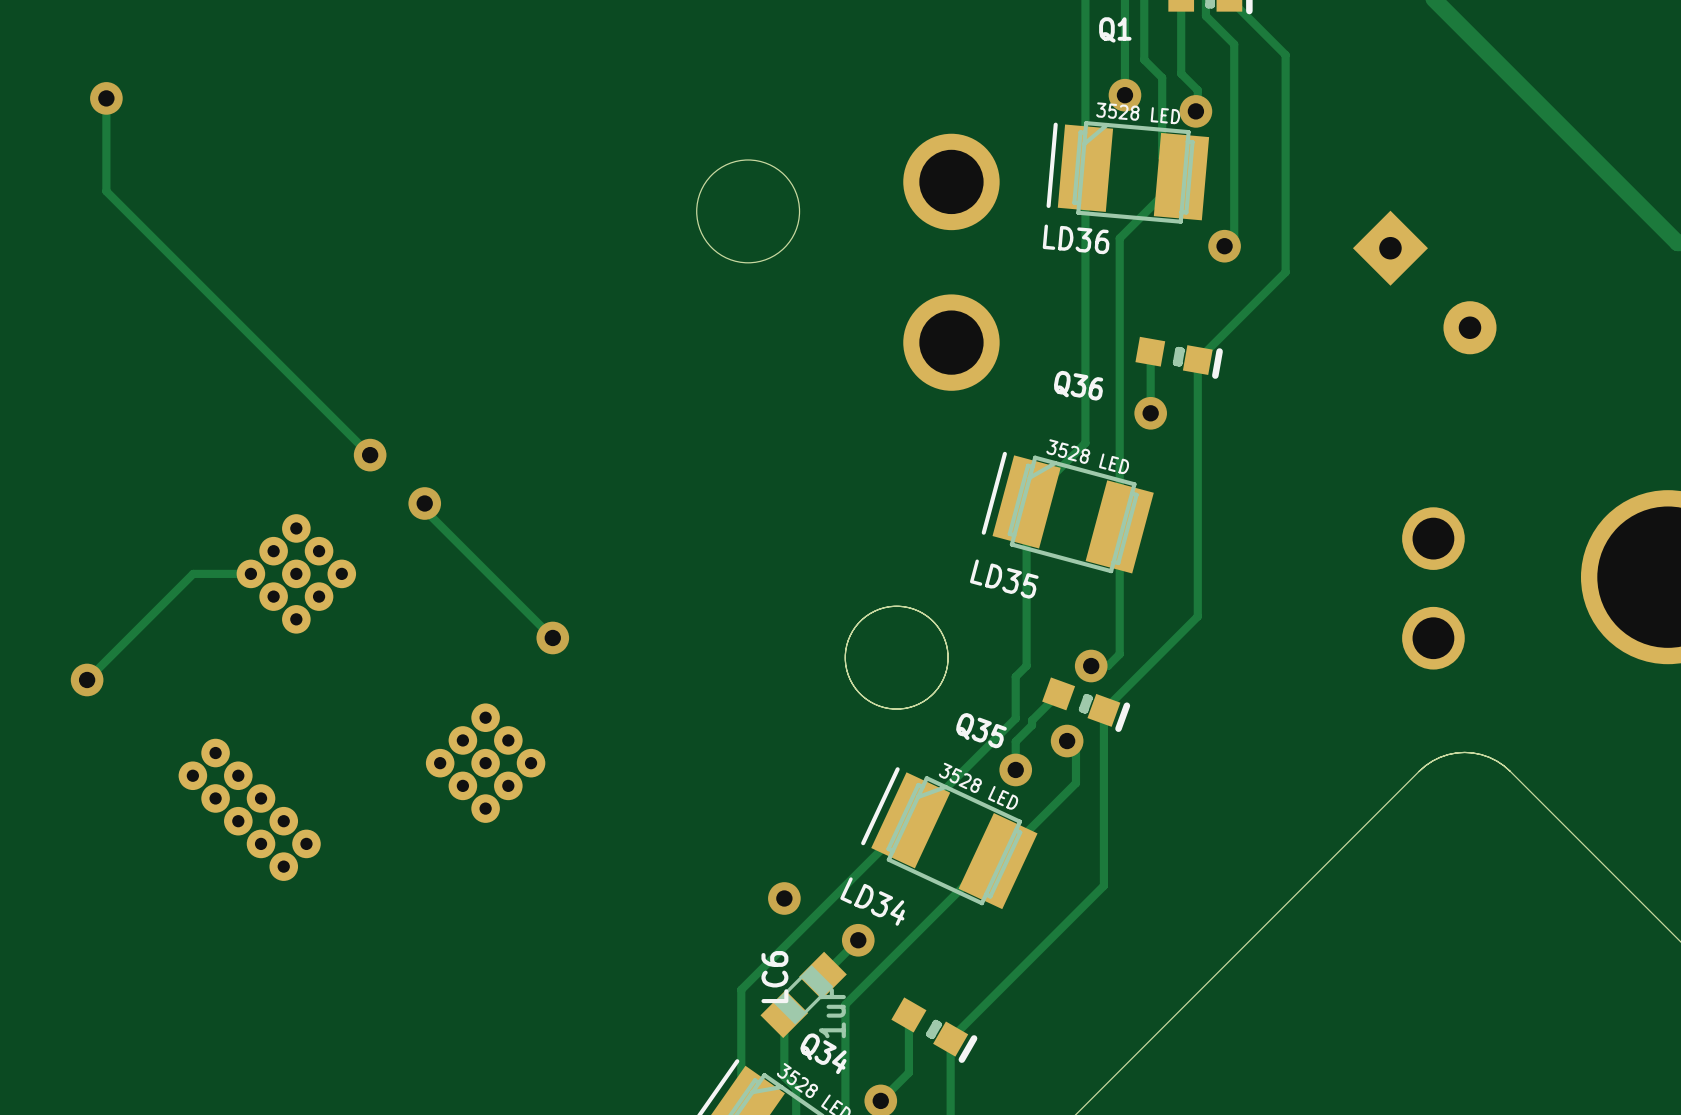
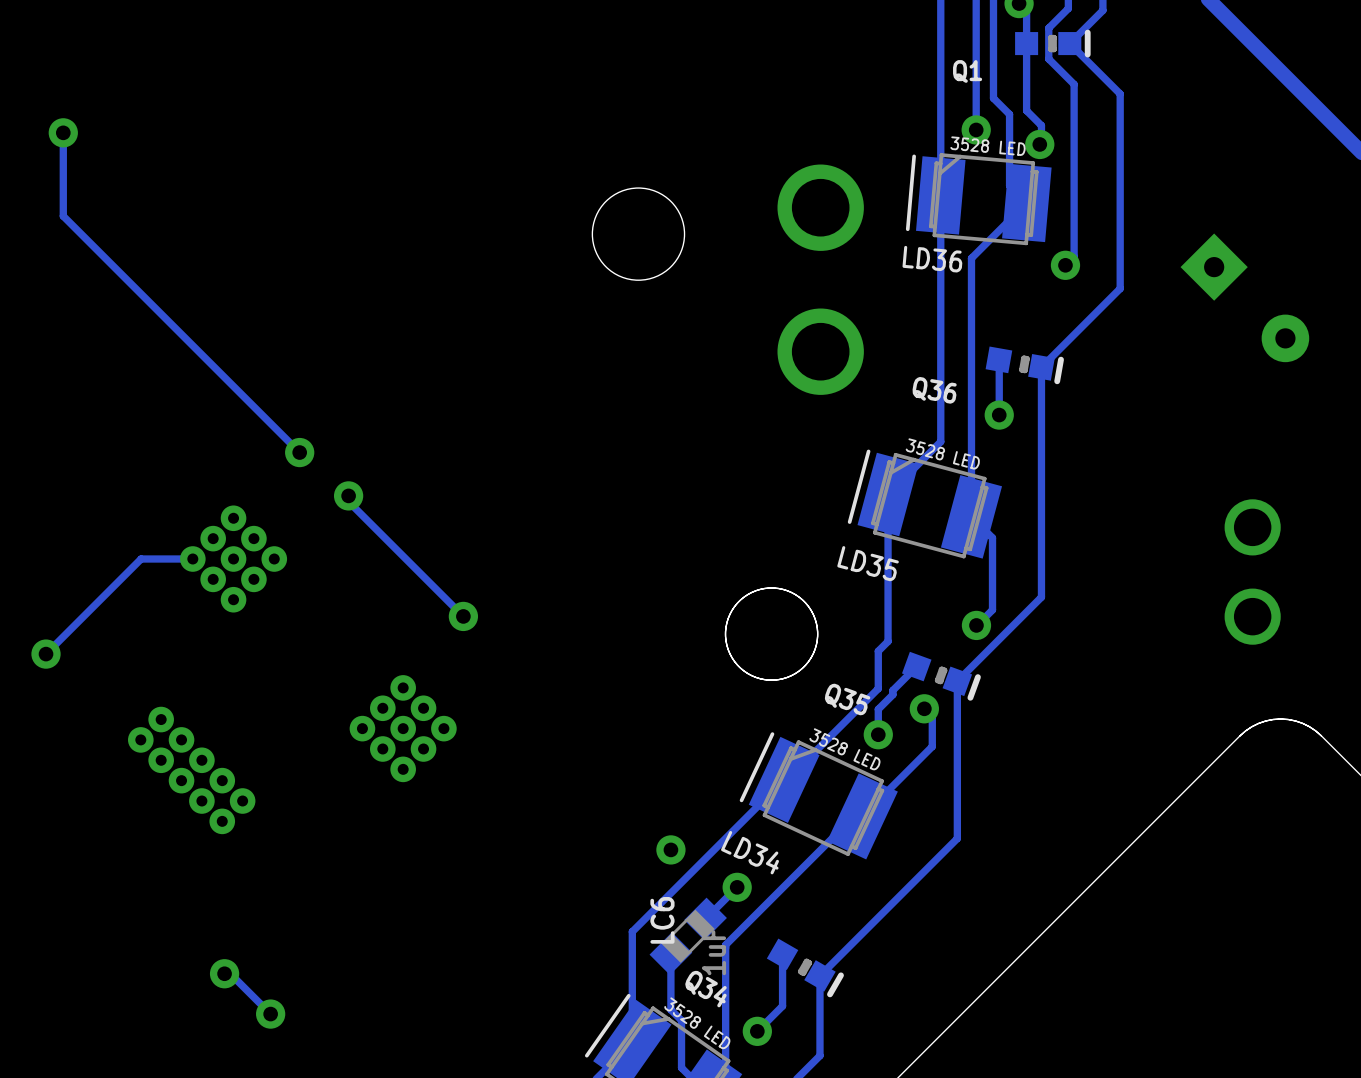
track: (1119, 526) (1119, 654) (1107, 666) (1091, 666) -> (971, 516) (992, 537) (992, 609) (977, 625)
via position: (1091, 666) -> (976, 625)
track: none -> (224, 973) (230, 973) (270, 1014)
via: none -> (224, 973)
via: none -> (270, 1014)

